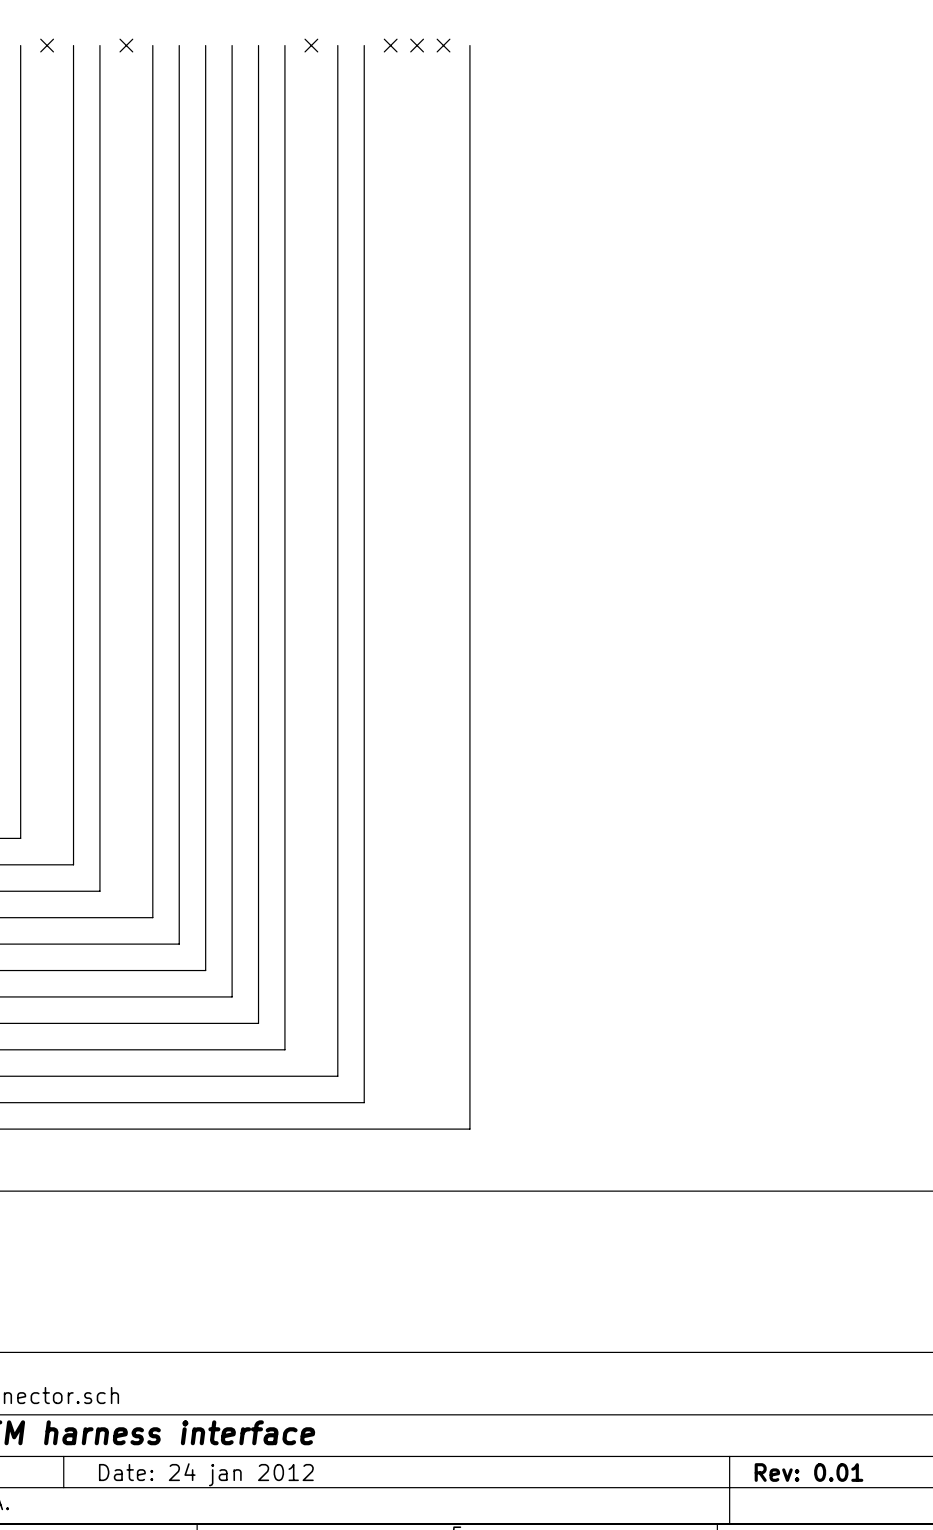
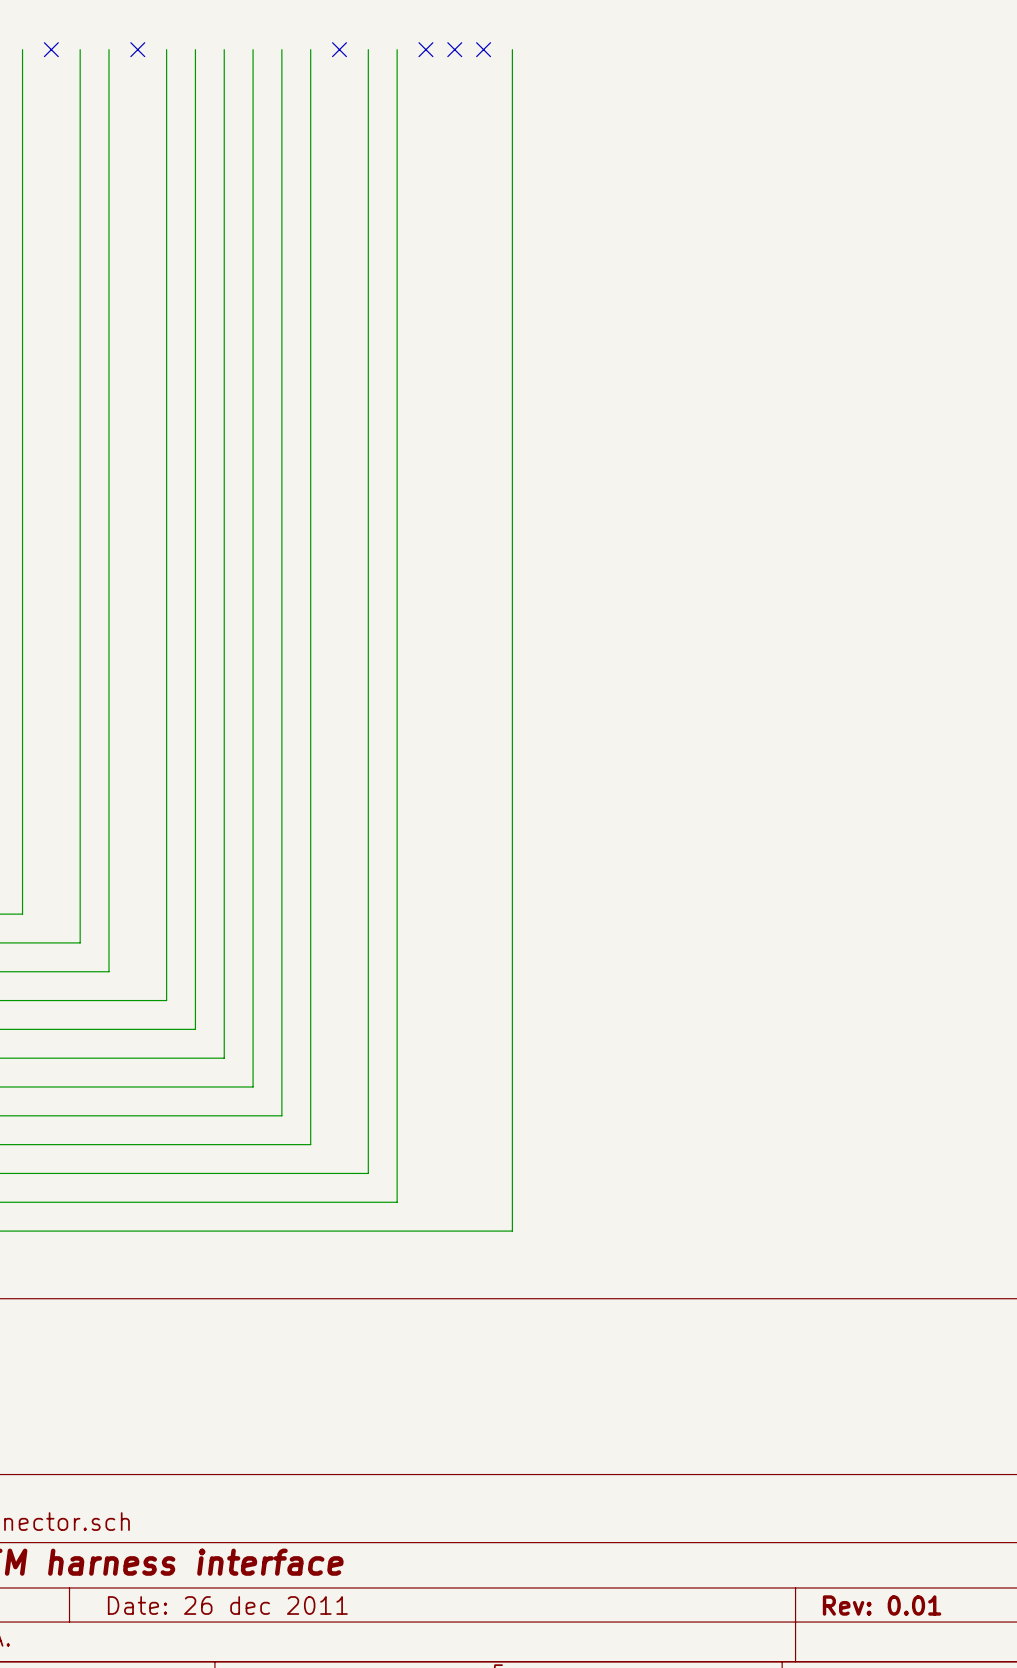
title block: Date: 24 jan 2012 (206, 1474) -> Date: 26 dec 2011 (227, 1605)

